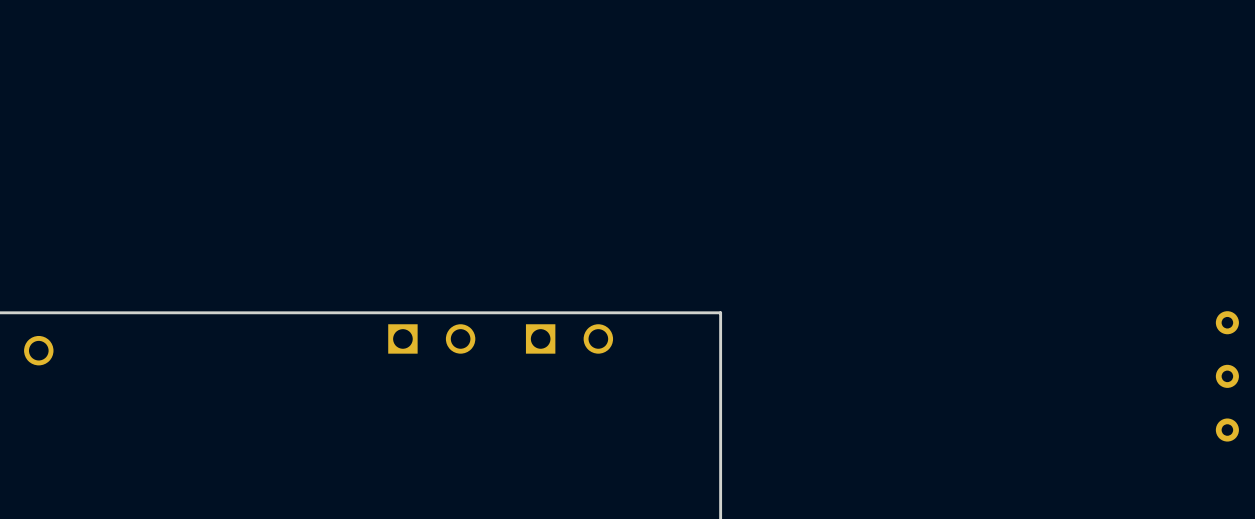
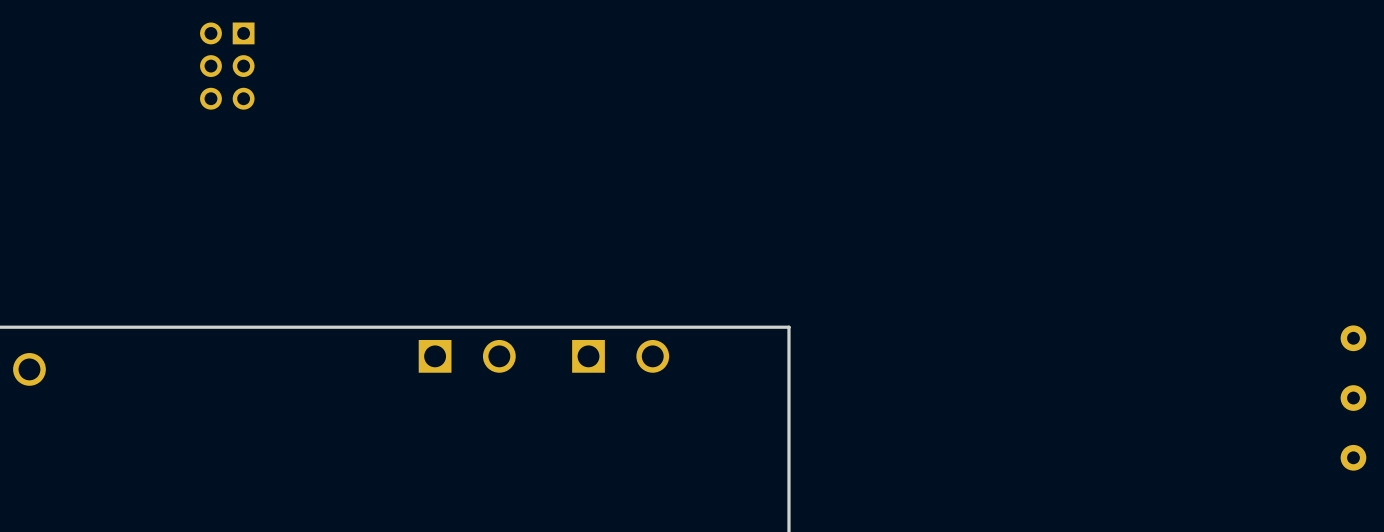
part: none -> (227, 66)

